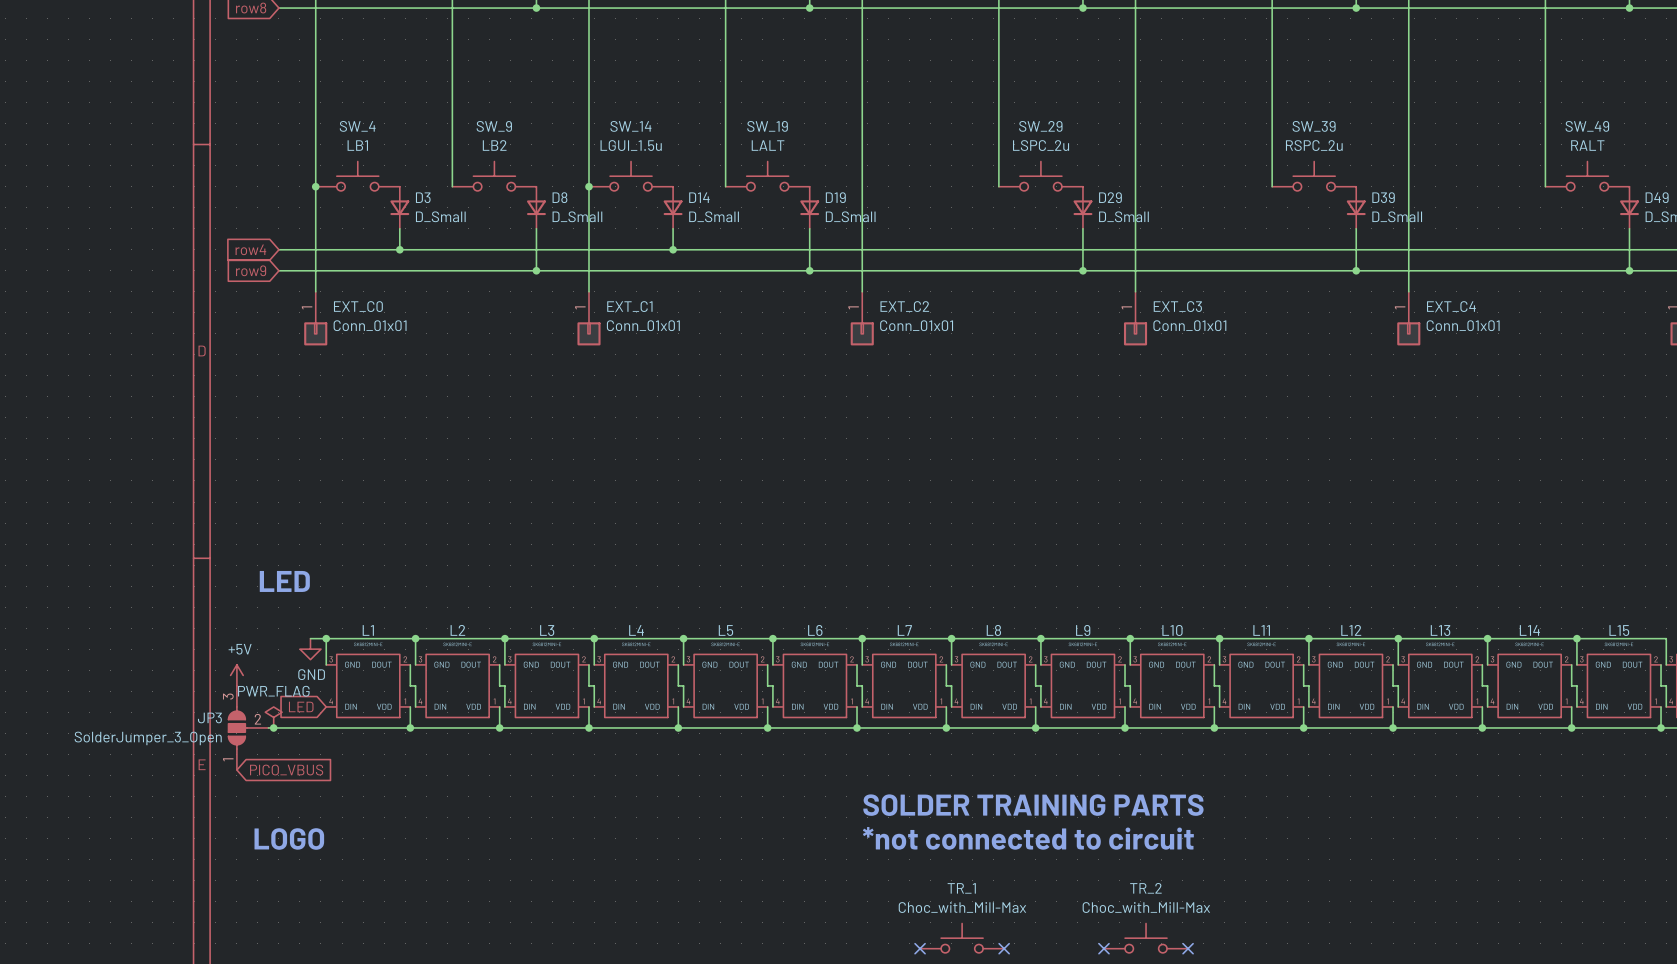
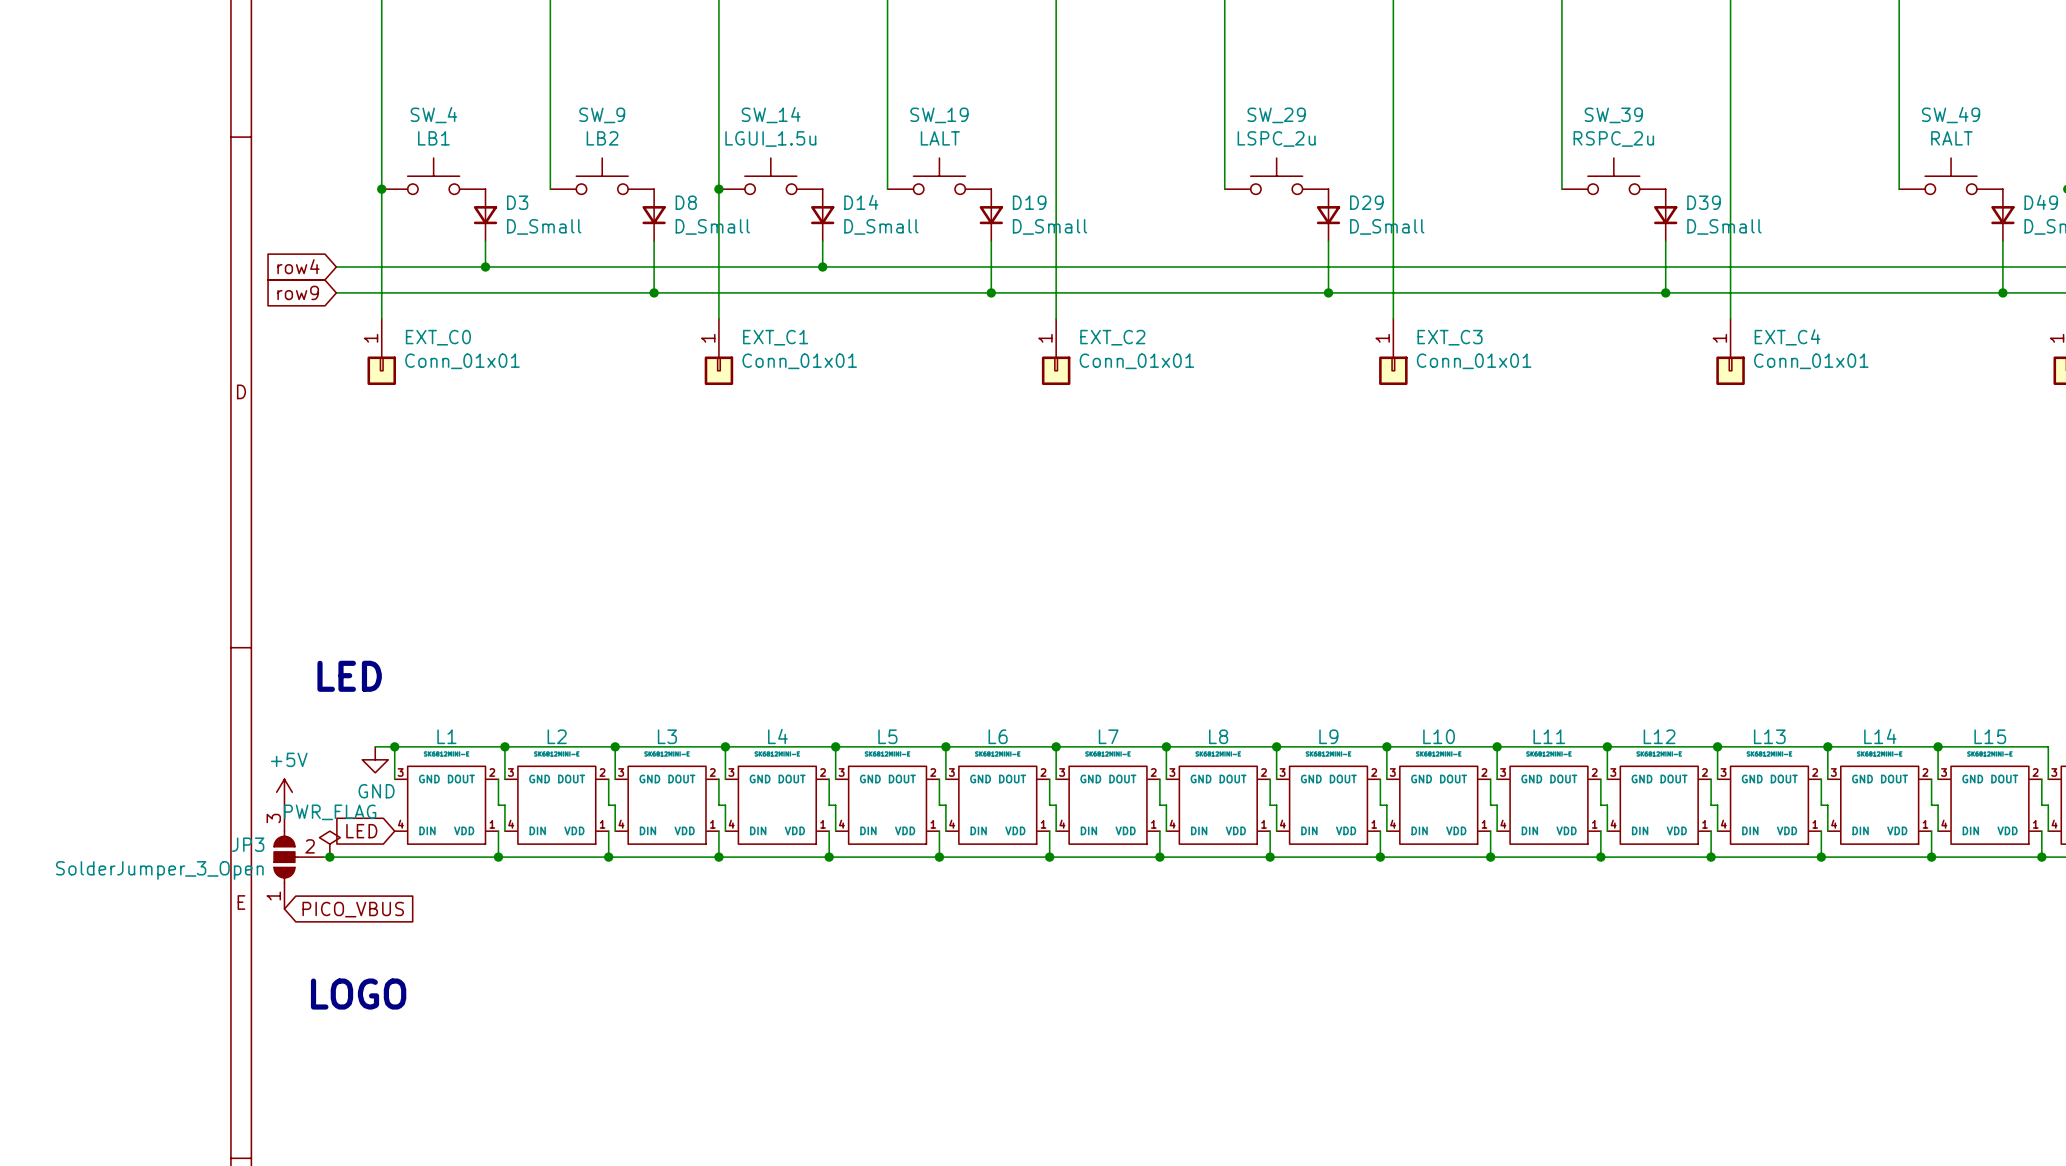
text: SOLDER TRAINING PARTS (1033, 805) -> none
text: *not connected to circuit (1028, 838) -> none
TR_1: Choc_with_Mill-Max (962, 938) -> none
TR_2: Choc_with_Mill-Max (1146, 938) -> none
no-connect mark: (920, 948) -> none
no-connect mark: (1004, 948) -> none
no-connect mark: (1103, 948) -> none
no-connect mark: (1188, 948) -> none

